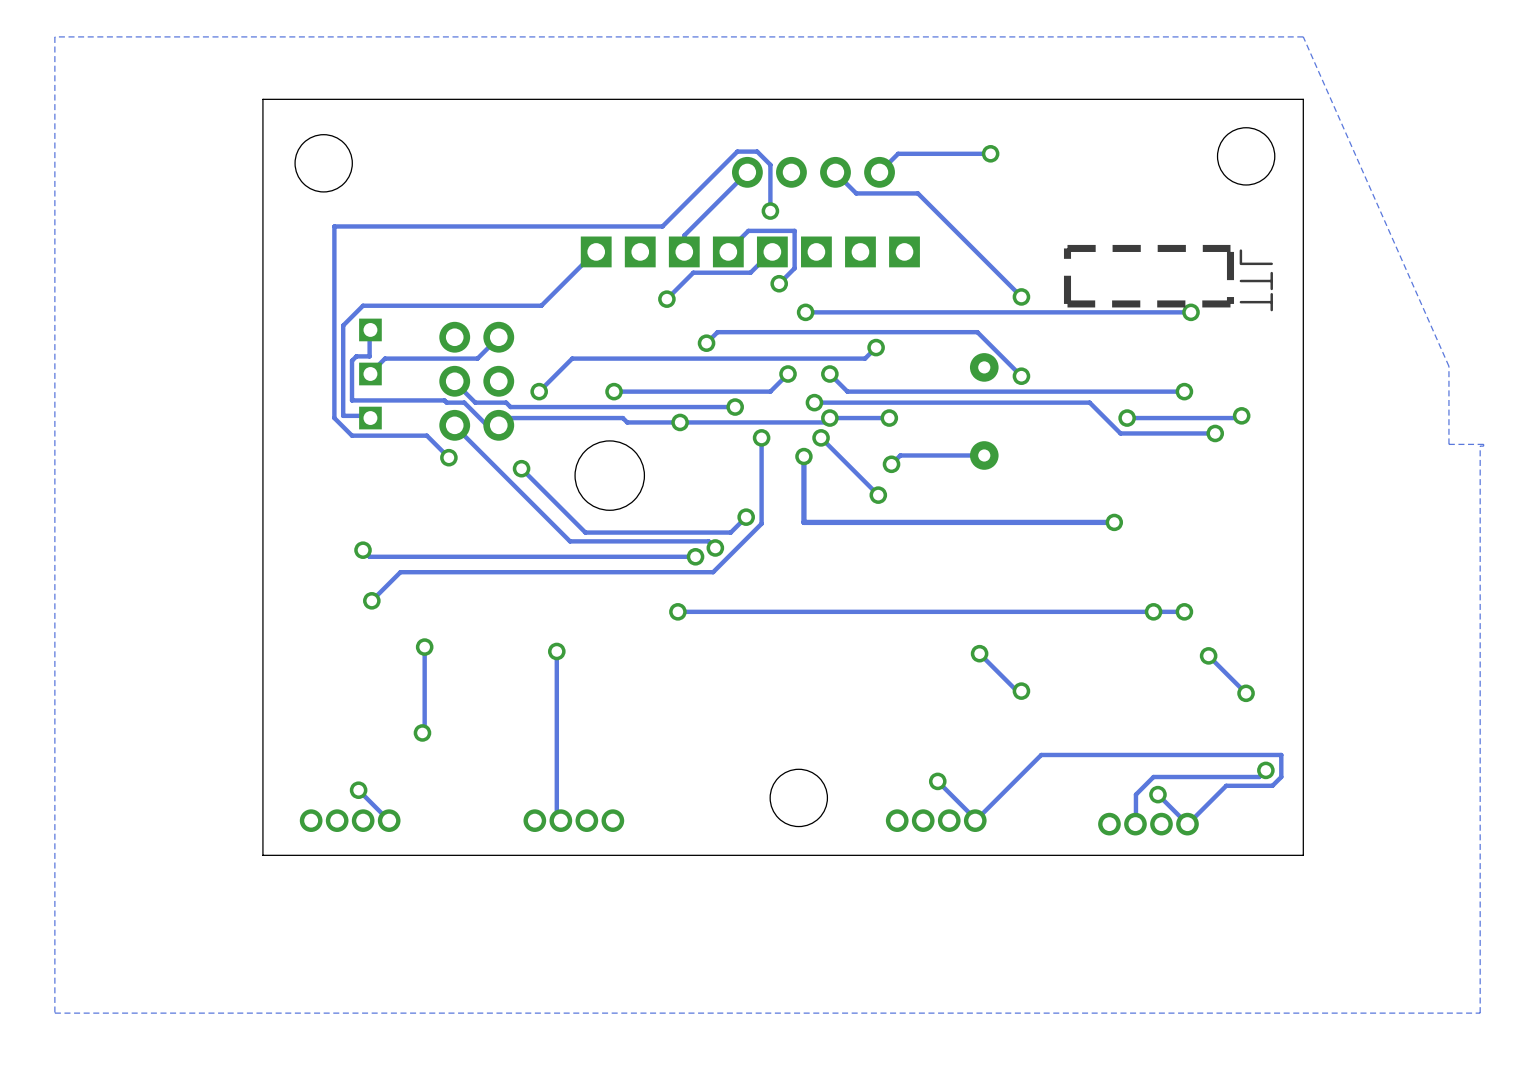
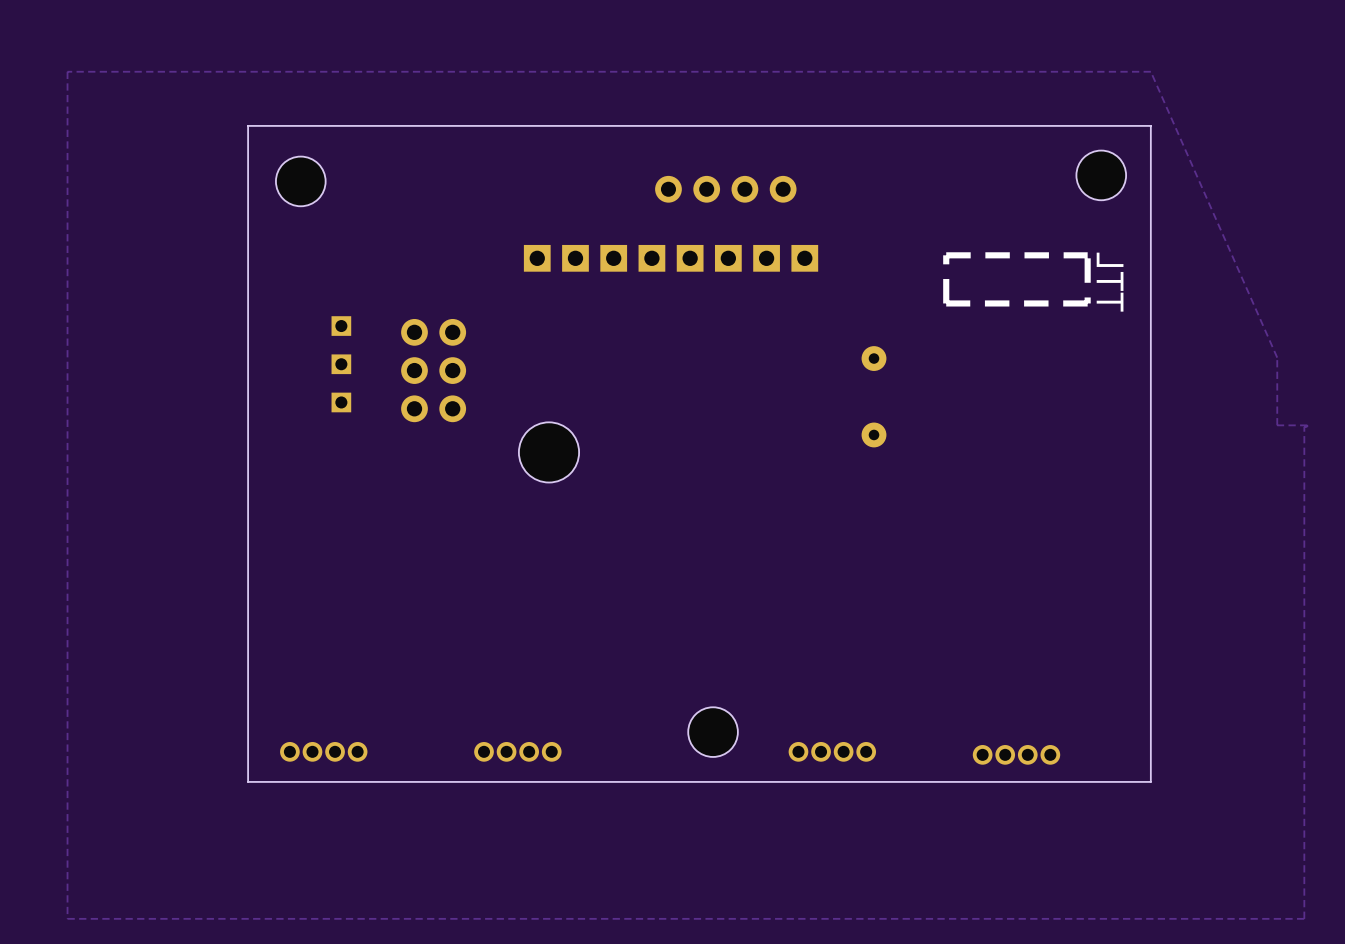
track: (990, 153) (898, 153) (879, 172) -> none
via: (990, 153) -> none
track: (747, 172) (684, 235) (684, 251) -> none
track: (835, 172) (856, 193) (917, 193) (1021, 296) -> none
track: (770, 211) (770, 164) (757, 151) (737, 151) (662, 226) (334, 226) (334, 418) (352, 435) (426, 435) (448, 457) -> none
via: (770, 211) -> none
track: (596, 251) (541, 305) (363, 305) (343, 325) (343, 415) (369, 415) (370, 418) -> none
track: (728, 251) (748, 230) (794, 230) (794, 268) (779, 283) -> none
track: (772, 251) (750, 272) (693, 272) (666, 299) -> none
via: (779, 283) -> none
via: (1021, 296) -> none
via: (666, 299) -> none
via: (805, 312) -> none
track: (1191, 312) (805, 312) -> none
via: (1191, 312) -> none
track: (370, 329) (369, 356) (356, 356) (352, 360) (352, 400) (444, 400) (446, 402) (464, 402) (486, 424) (498, 425) (506, 418) (622, 418) (627, 422) (825, 422) (829, 418) (889, 418) -> none
track: (498, 337) (477, 358) (385, 358) (370, 373) -> none
track: (706, 343) (717, 332) (977, 332) (1021, 376) -> none
via: (706, 343) -> none
track: (876, 347) (865, 358) (572, 358) (539, 391) -> none
via: (876, 347) -> none
track: (788, 374) (770, 391) (614, 391) -> none
via: (788, 374) -> none
track: (829, 374) (847, 391) (1184, 391) -> none
via: (829, 374) -> none
via: (1021, 376) -> none
track: (454, 381) (475, 402) (506, 402) (510, 407) (735, 407) -> none
via: (539, 391) -> none
via: (614, 391) -> none
via: (1184, 391) -> none
track: (814, 402) (1089, 402) (1120, 433) (1215, 433) -> none
via: (814, 402) -> none
via: (735, 407) -> none
track: (1241, 415) (1239, 418) (1127, 418) -> none
via: (1241, 415) -> none
via: (829, 418) -> none
via: (889, 418) -> none
via: (1127, 418) -> none
via: (680, 422) -> none
track: (454, 425) (570, 541) (708, 541) (715, 547) -> none
via: (1215, 433) -> none
track: (761, 437) (761, 523) (713, 572) (400, 572) (371, 600) -> none
via: (761, 437) -> none
track: (821, 437) (878, 495) -> none
via: (821, 437) -> none
track: (984, 455) (900, 455) (891, 464) -> none
track: (803, 456) (803, 522) (1114, 522) -> none
via: (803, 456) -> none
via: (448, 457) -> none
via: (891, 464) -> none
track: (521, 468) (585, 532) (730, 532) (746, 517) -> none
via: (521, 468) -> none
via: (878, 495) -> none
via: (746, 517) -> none
via: (1114, 522) -> none
via: (715, 547) -> none
track: (363, 550) (369, 556) (695, 556) -> none
via: (363, 550) -> none
via: (695, 556) -> none
via: (371, 600) -> none
via: (677, 611) -> none
via: (1153, 611) -> none
track: (1184, 611) (677, 611) -> none
via: (1184, 611) -> none
track: (424, 647) (424, 732) (422, 732) -> none
via: (424, 647) -> none
track: (556, 651) (556, 818) (560, 820) -> none
via: (556, 651) -> none
track: (979, 653) (1017, 691) (1021, 691) -> none
via: (979, 653) -> none
track: (1208, 655) (1246, 693) -> none
via: (1208, 655) -> none
via: (1021, 691) -> none
via: (1246, 693) -> none
via: (422, 732) -> none
track: (1265, 770) (1259, 777) (1153, 777) (1135, 794) (1135, 824) -> none
via: (1265, 770) -> none
track: (937, 781) (975, 820) (1041, 754) (1281, 754) (1281, 777) (1272, 785) (1226, 785) (1187, 824) (1157, 794) -> none
via: (937, 781) -> none
track: (358, 790) (389, 820) -> none
via: (358, 790) -> none
via: (1157, 794) -> none

